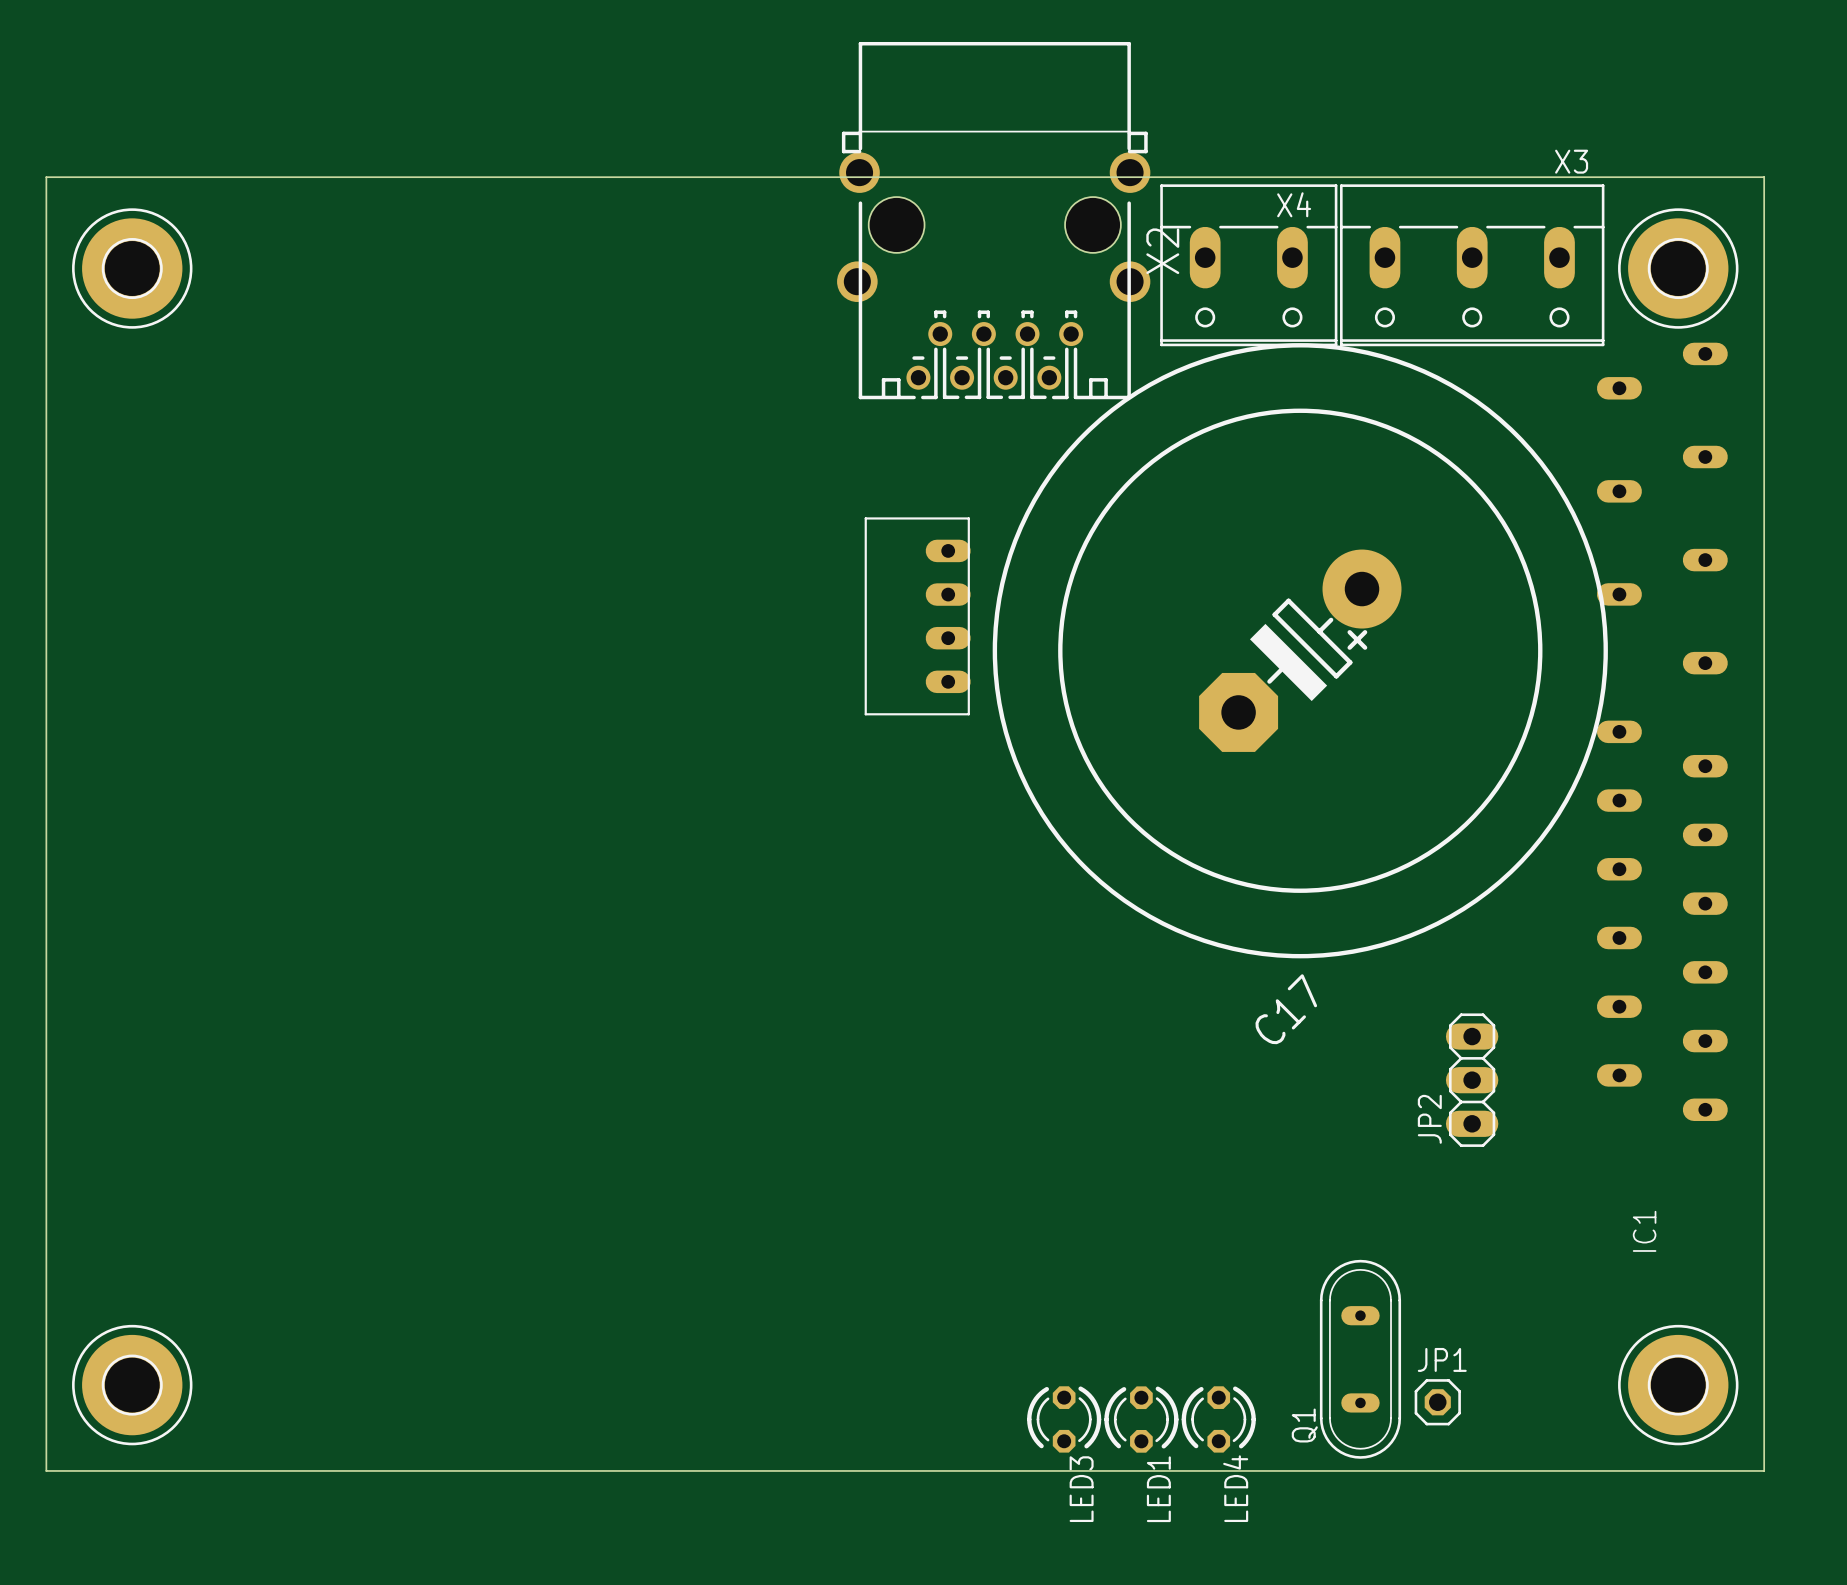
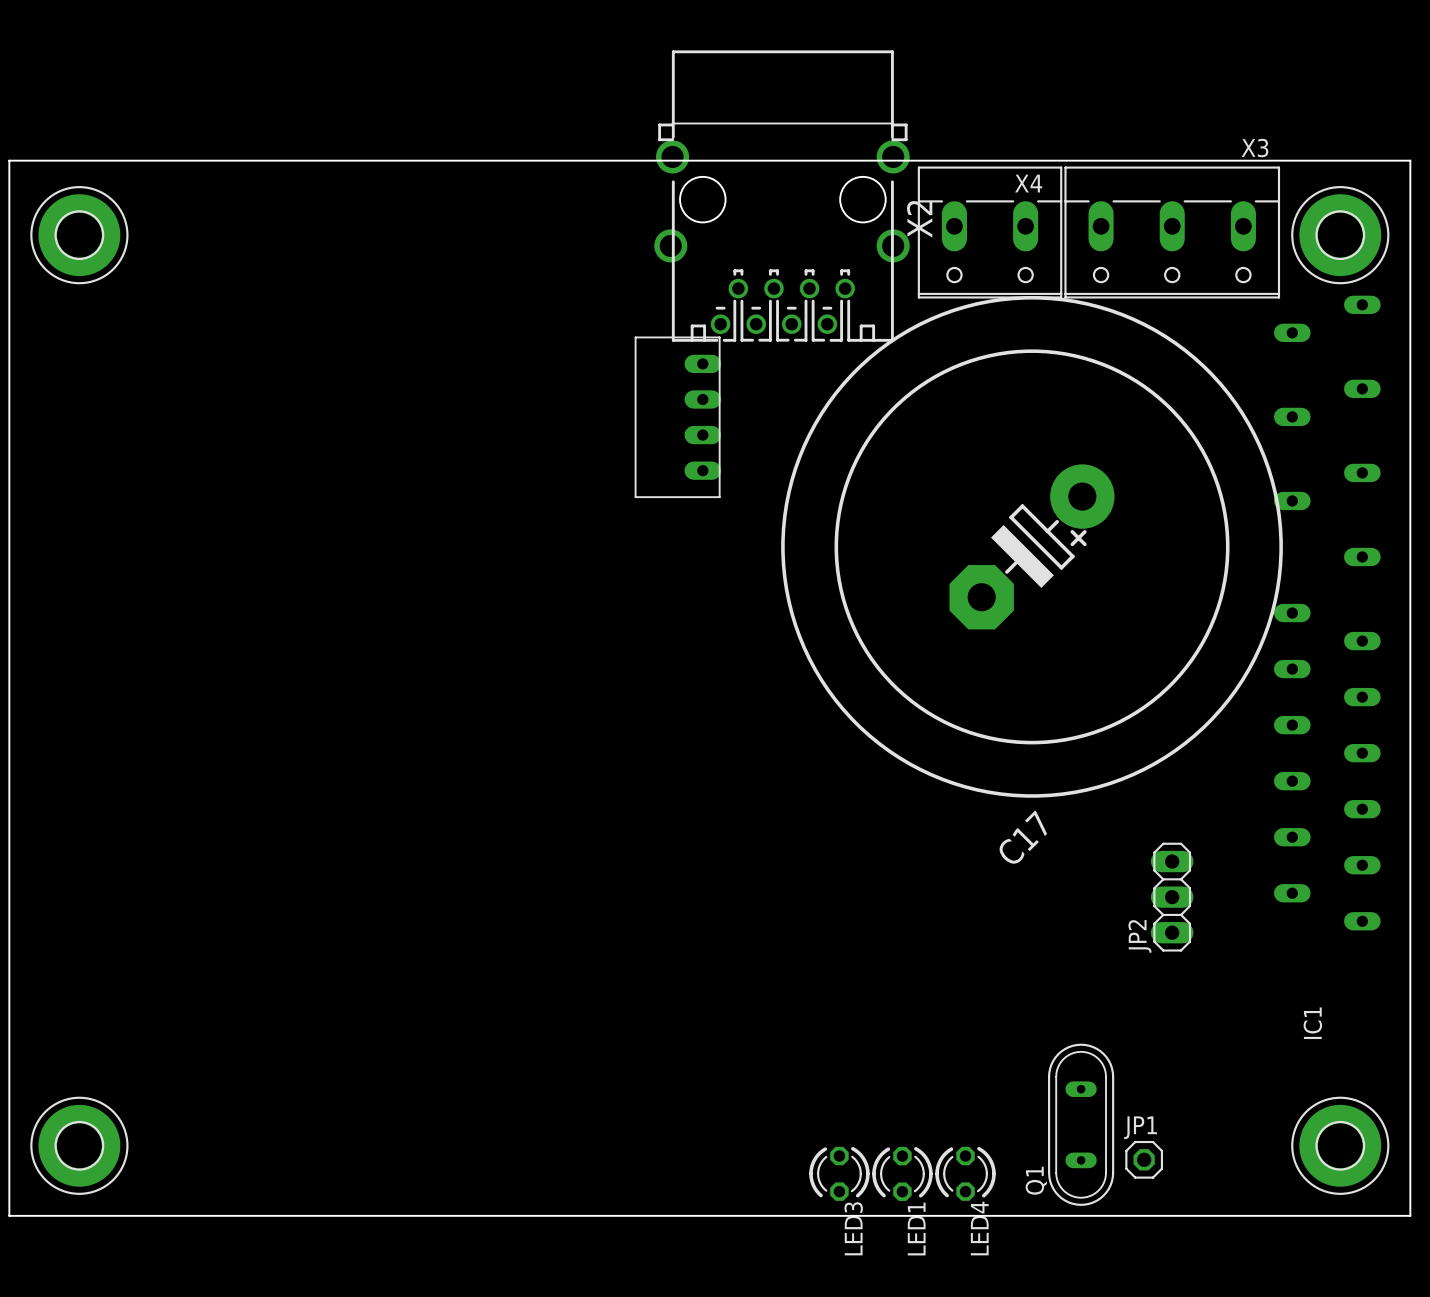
part position: (917, 616) -> (677, 417)

